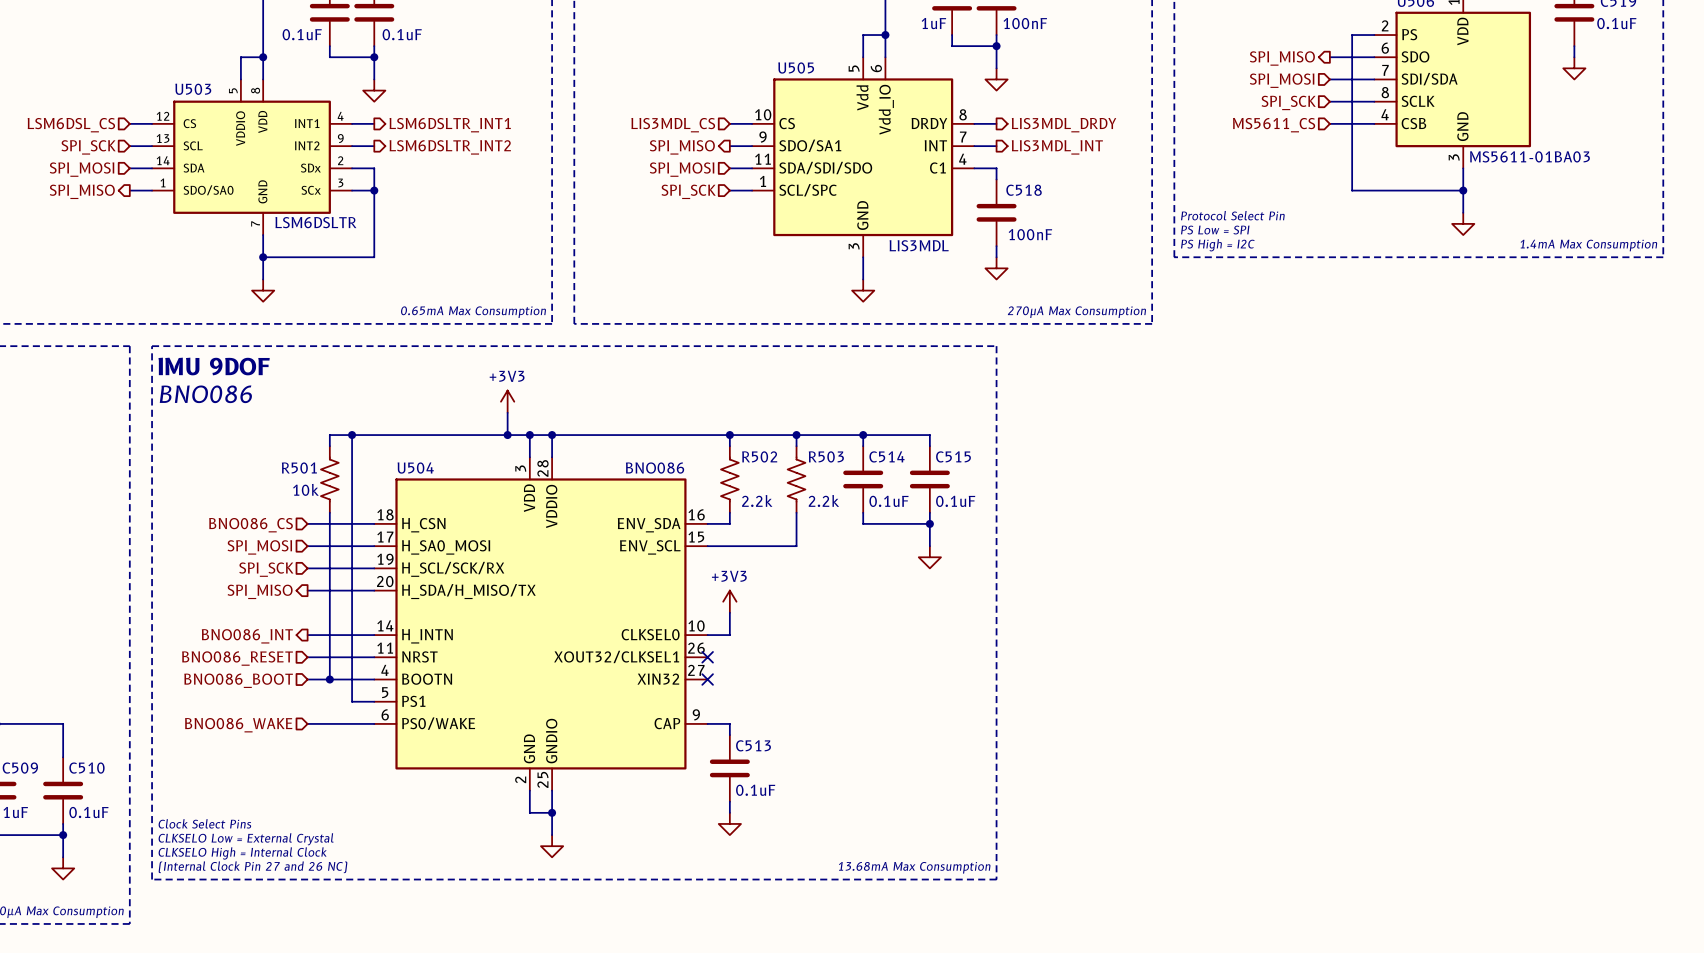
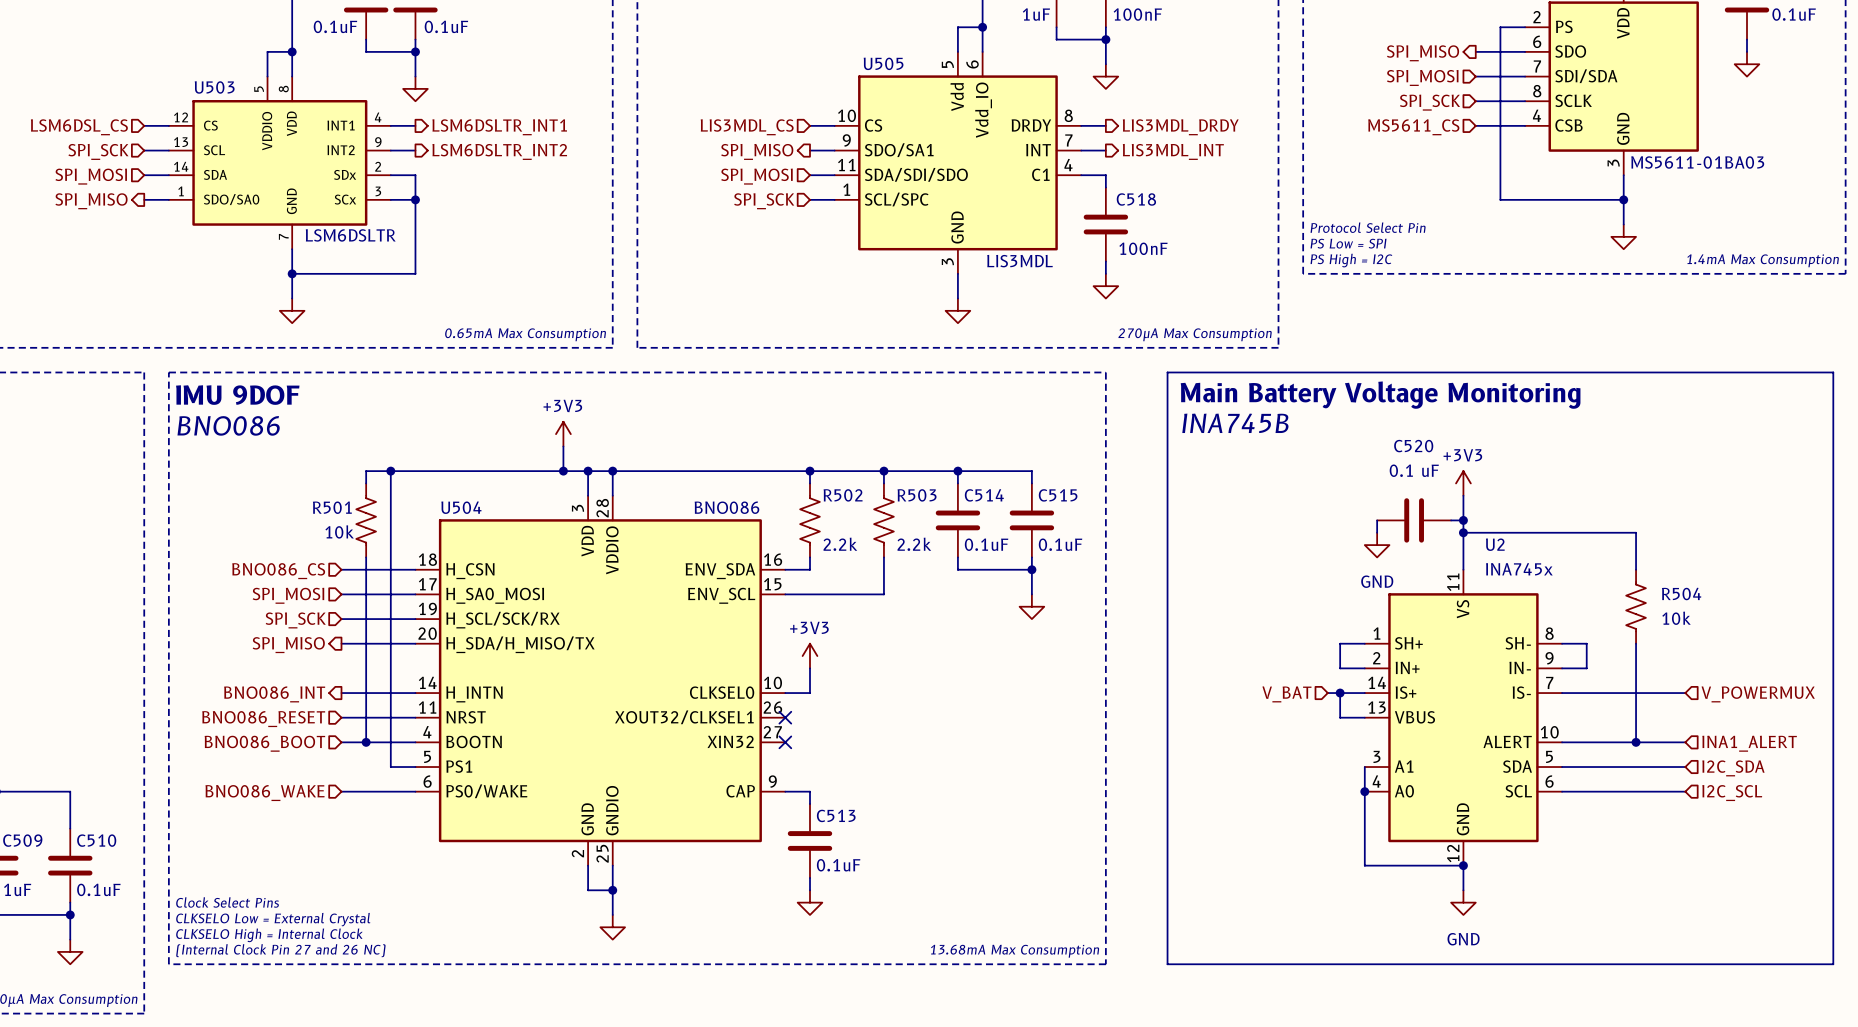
line: none -> (1167, 372) (1833, 372) (1833, 964) (1167, 964) (1167, 372)
text: none -> Main Battery Voltage Monitoring (1380, 395)
text: none -> INA745B (1235, 423)
power symbol: none -> +3V3 (1463, 483)
wire: none -> (1463, 495) (1463, 569)
wire: none -> (1377, 520) (1377, 532)
C520: none -> 0.1 uF (1414, 520)
wire: none -> (1451, 520) (1463, 520)
junction: none -> (1463, 520)
wire: none -> (1463, 532) (1636, 532) (1636, 569)
junction: none -> (1463, 532)
power symbol: none -> GND (1377, 545)
R504: none -> 10k (1636, 606)
wire: none -> (1364, 643) (1340, 643) (1340, 668) (1364, 668)
wire: none -> (1562, 643) (1586, 643) (1586, 668) (1562, 668)
wire: none -> (1636, 643) (1636, 742)
wire: none -> (1327, 693) (1364, 693)
wire: none -> (1340, 693) (1340, 717) (1364, 717)
junction: none -> (1340, 693)
wire: none -> (1562, 693) (1685, 693)
hierarchical label: none -> V_BAT (1286, 694)
hierarchical label: none -> V_POWERMUX (1758, 694)
U2: none -> INA745x (1463, 717)
wire: none -> (1562, 742) (1685, 742)
junction: none -> (1636, 742)
hierarchical label: none -> INA1_ALERT (1749, 743)
wire: none -> (1364, 767) (1364, 865) (1463, 865) (1463, 890)
wire: none -> (1562, 767) (1685, 767)
hierarchical label: none -> I2C_SDA (1733, 768)
junction: none -> (1364, 791)
wire: none -> (1562, 791) (1685, 791)
hierarchical label: none -> I2C_SCL (1732, 793)
junction: none -> (1463, 865)
power symbol: none -> GND (1463, 902)

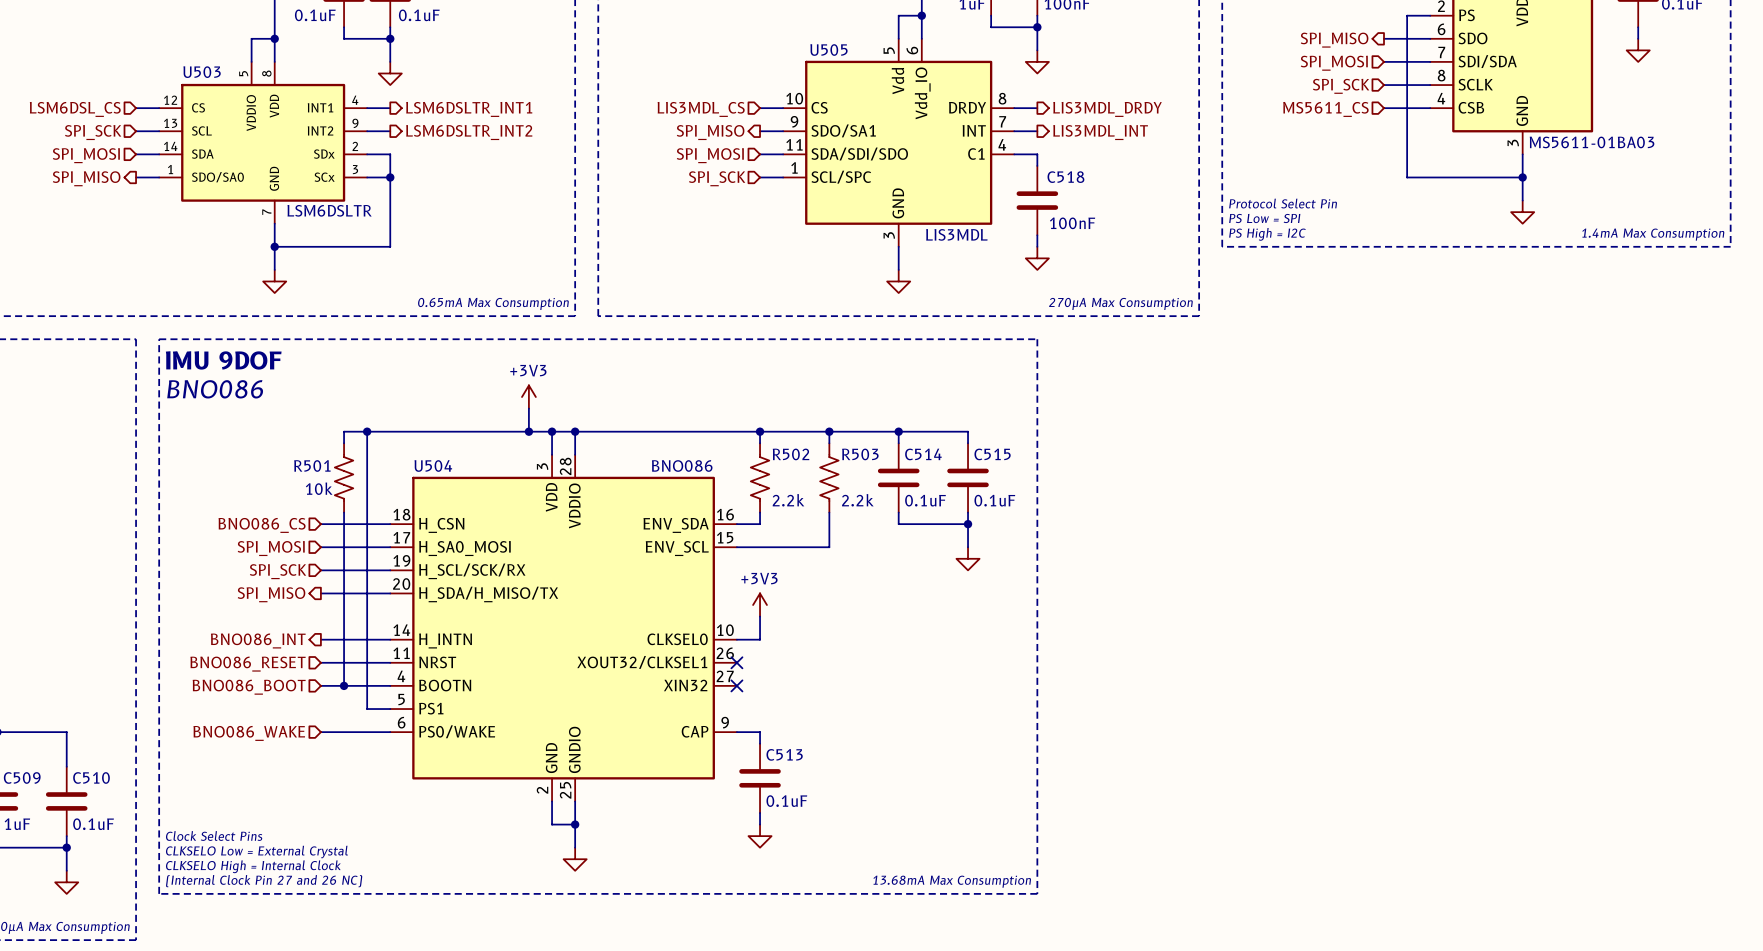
line: (1167, 372) (1833, 372) (1833, 964) (1167, 964) (1167, 372) -> none
text: Main Battery Voltage Monitoring (1380, 395) -> none
text: INA745B (1235, 423) -> none
power symbol: +3V3 (1463, 483) -> none
wire: (1463, 495) (1463, 569) -> none
wire: (1377, 520) (1377, 532) -> none
C520: 0.1 uF (1414, 520) -> none
wire: (1451, 520) (1463, 520) -> none
junction: (1463, 520) -> none
wire: (1463, 532) (1636, 532) (1636, 569) -> none
junction: (1463, 532) -> none
power symbol: GND (1377, 545) -> none
R504: 10k (1636, 606) -> none
wire: (1364, 643) (1340, 643) (1340, 668) (1364, 668) -> none
wire: (1562, 643) (1586, 643) (1586, 668) (1562, 668) -> none
wire: (1636, 643) (1636, 742) -> none
wire: (1327, 693) (1364, 693) -> none
wire: (1340, 693) (1340, 717) (1364, 717) -> none
junction: (1340, 693) -> none
wire: (1562, 693) (1685, 693) -> none
hierarchical label: V_BAT (1286, 694) -> none
hierarchical label: V_POWERMUX (1758, 694) -> none
U2: INA745x (1463, 717) -> none
wire: (1562, 742) (1685, 742) -> none
junction: (1636, 742) -> none
hierarchical label: INA1_ALERT (1749, 743) -> none
wire: (1364, 767) (1364, 865) (1463, 865) (1463, 890) -> none
wire: (1562, 767) (1685, 767) -> none
hierarchical label: I2C_SDA (1733, 768) -> none
junction: (1364, 791) -> none
wire: (1562, 791) (1685, 791) -> none
hierarchical label: I2C_SCL (1732, 793) -> none
junction: (1463, 865) -> none
power symbol: GND (1463, 902) -> none

